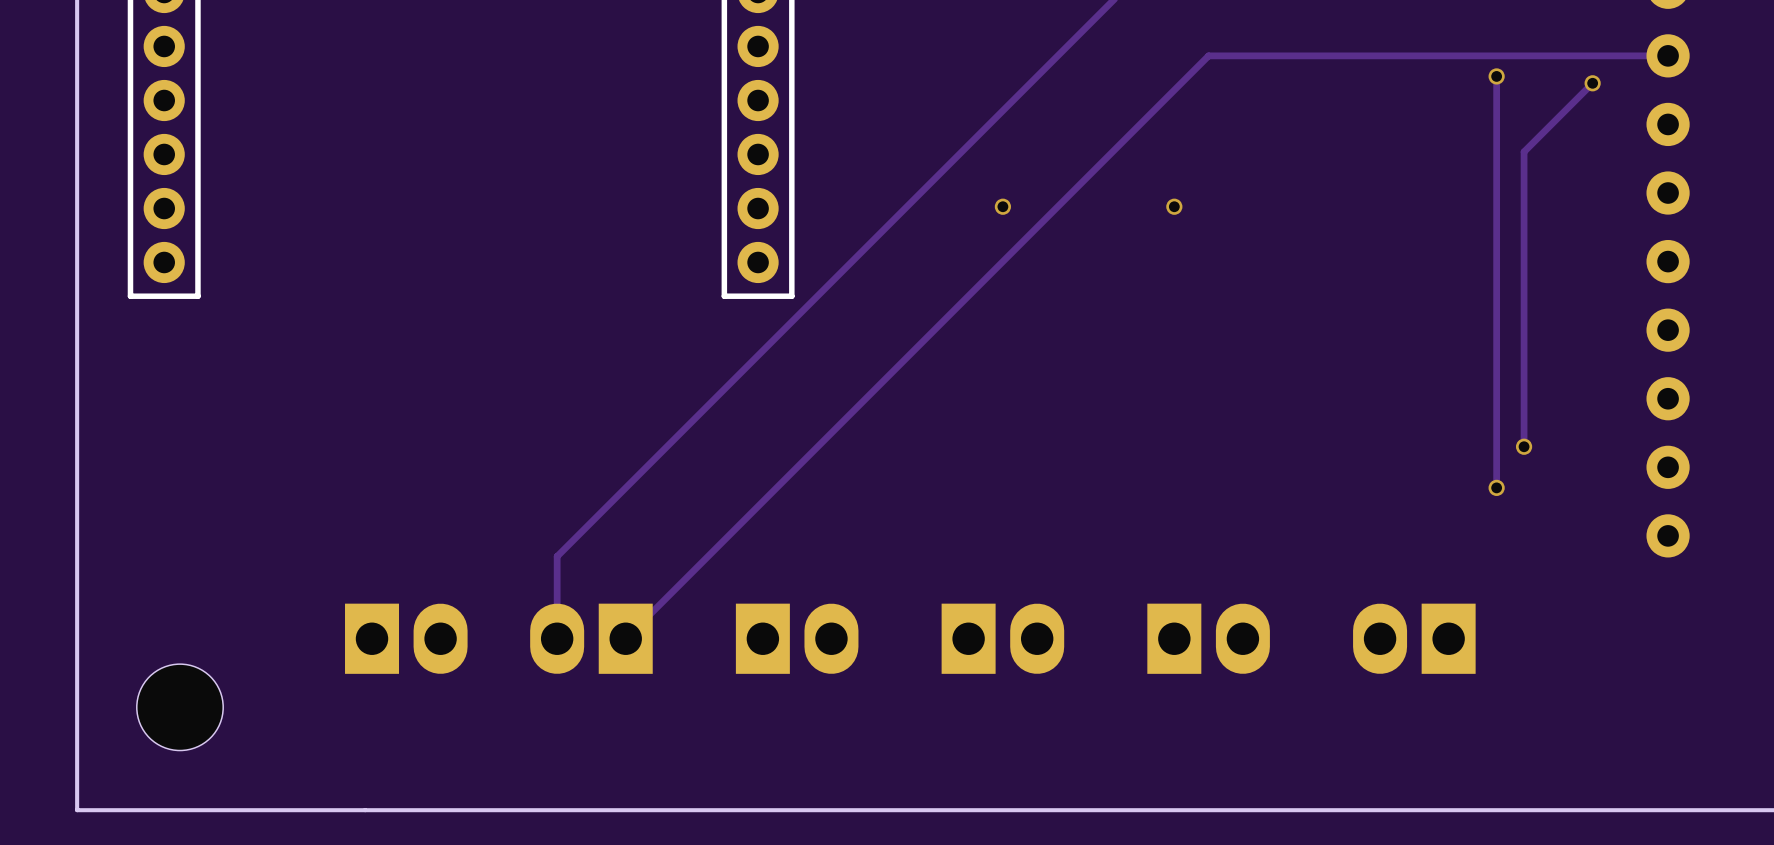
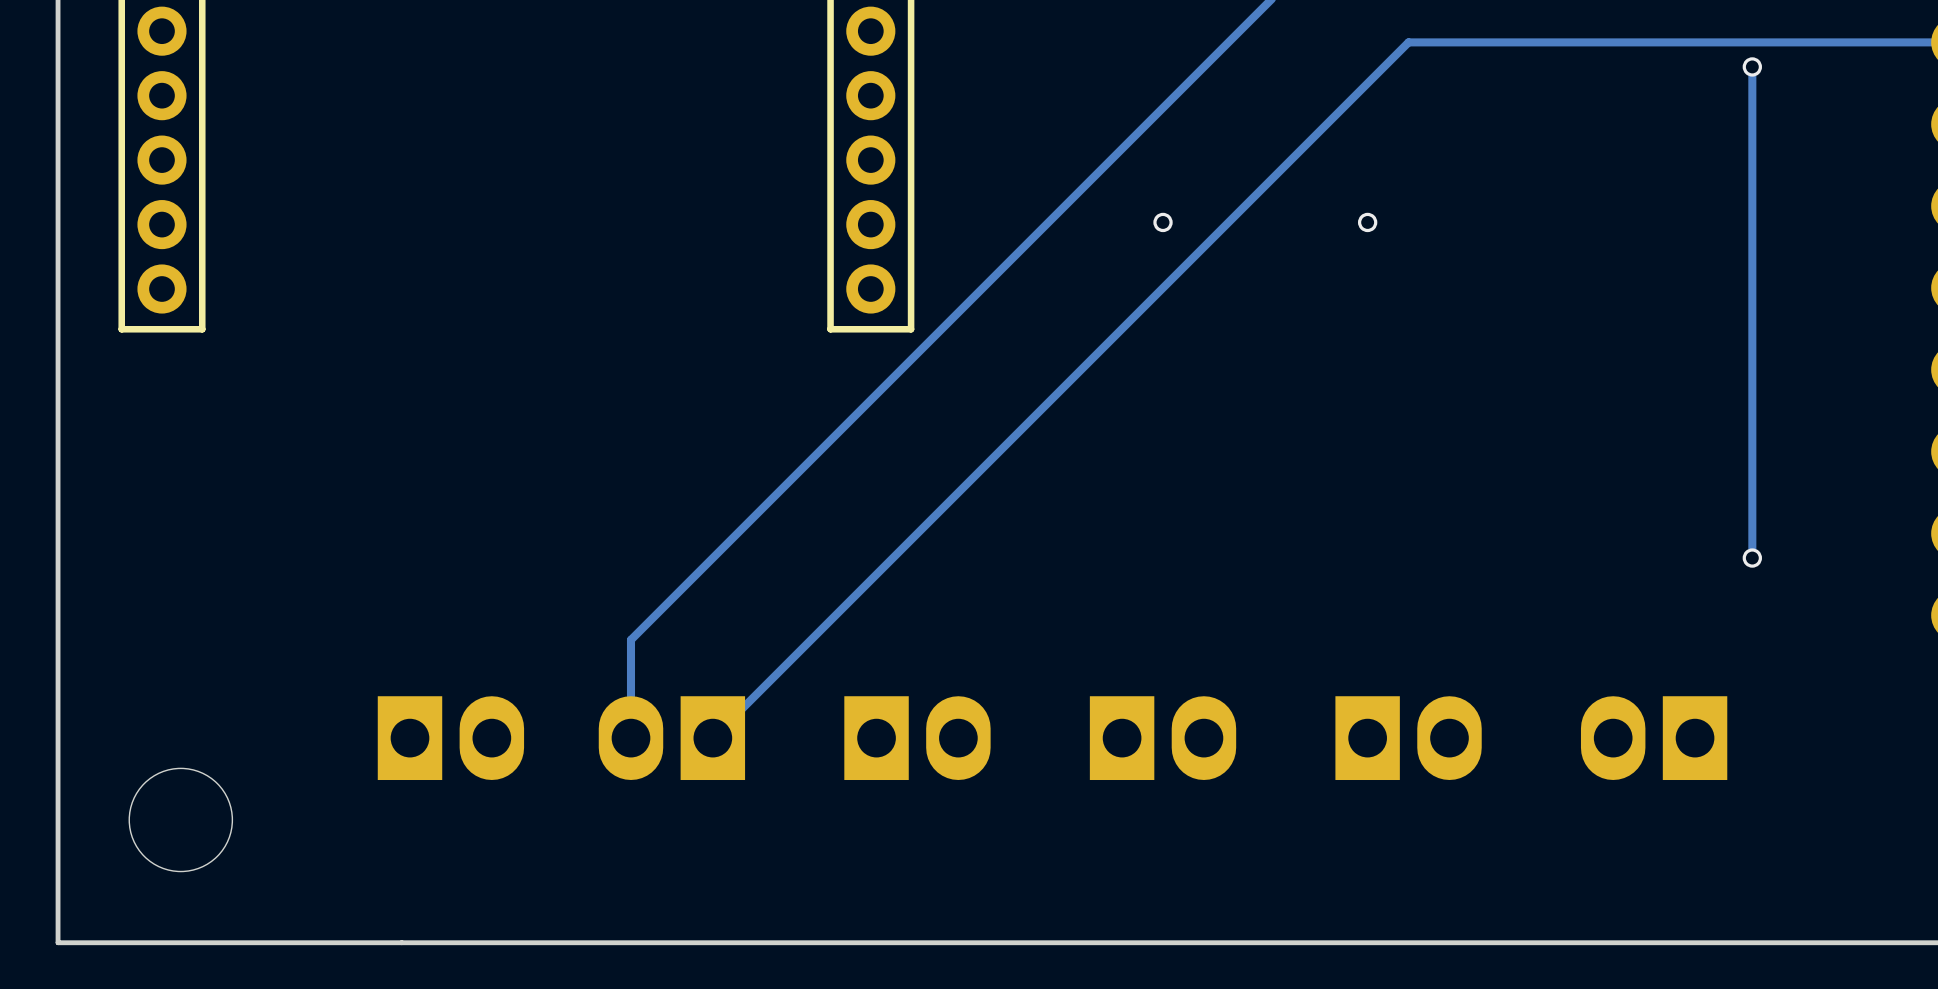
track: (1592, 83) (1524, 151) (1524, 446) -> none
via: (1592, 83) -> none
via: (1524, 446) -> none

